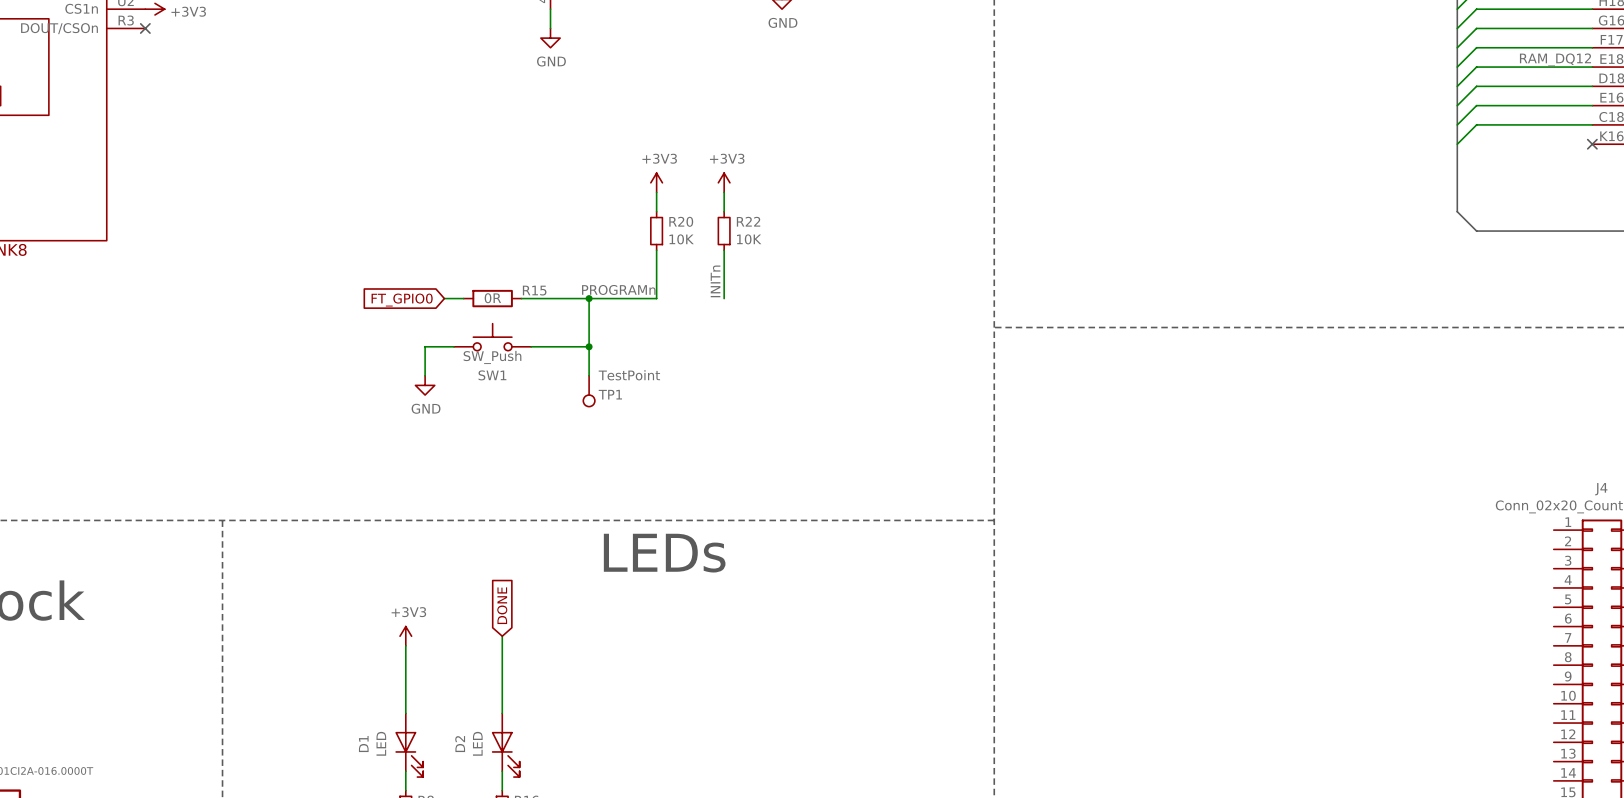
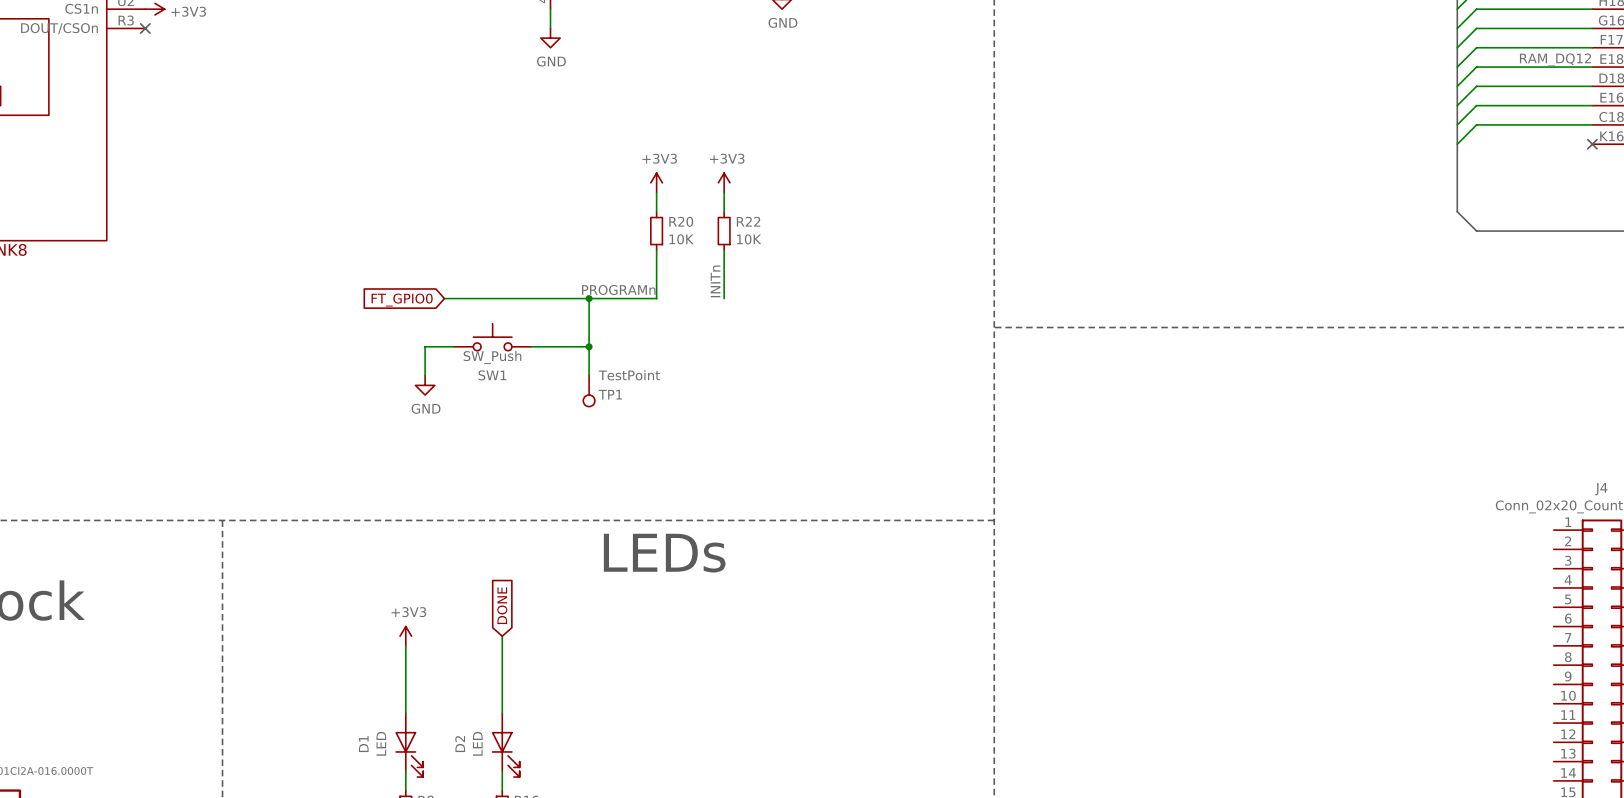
wire: none -> (463, 298) (521, 298)
R15: 0R (492, 298) -> none

